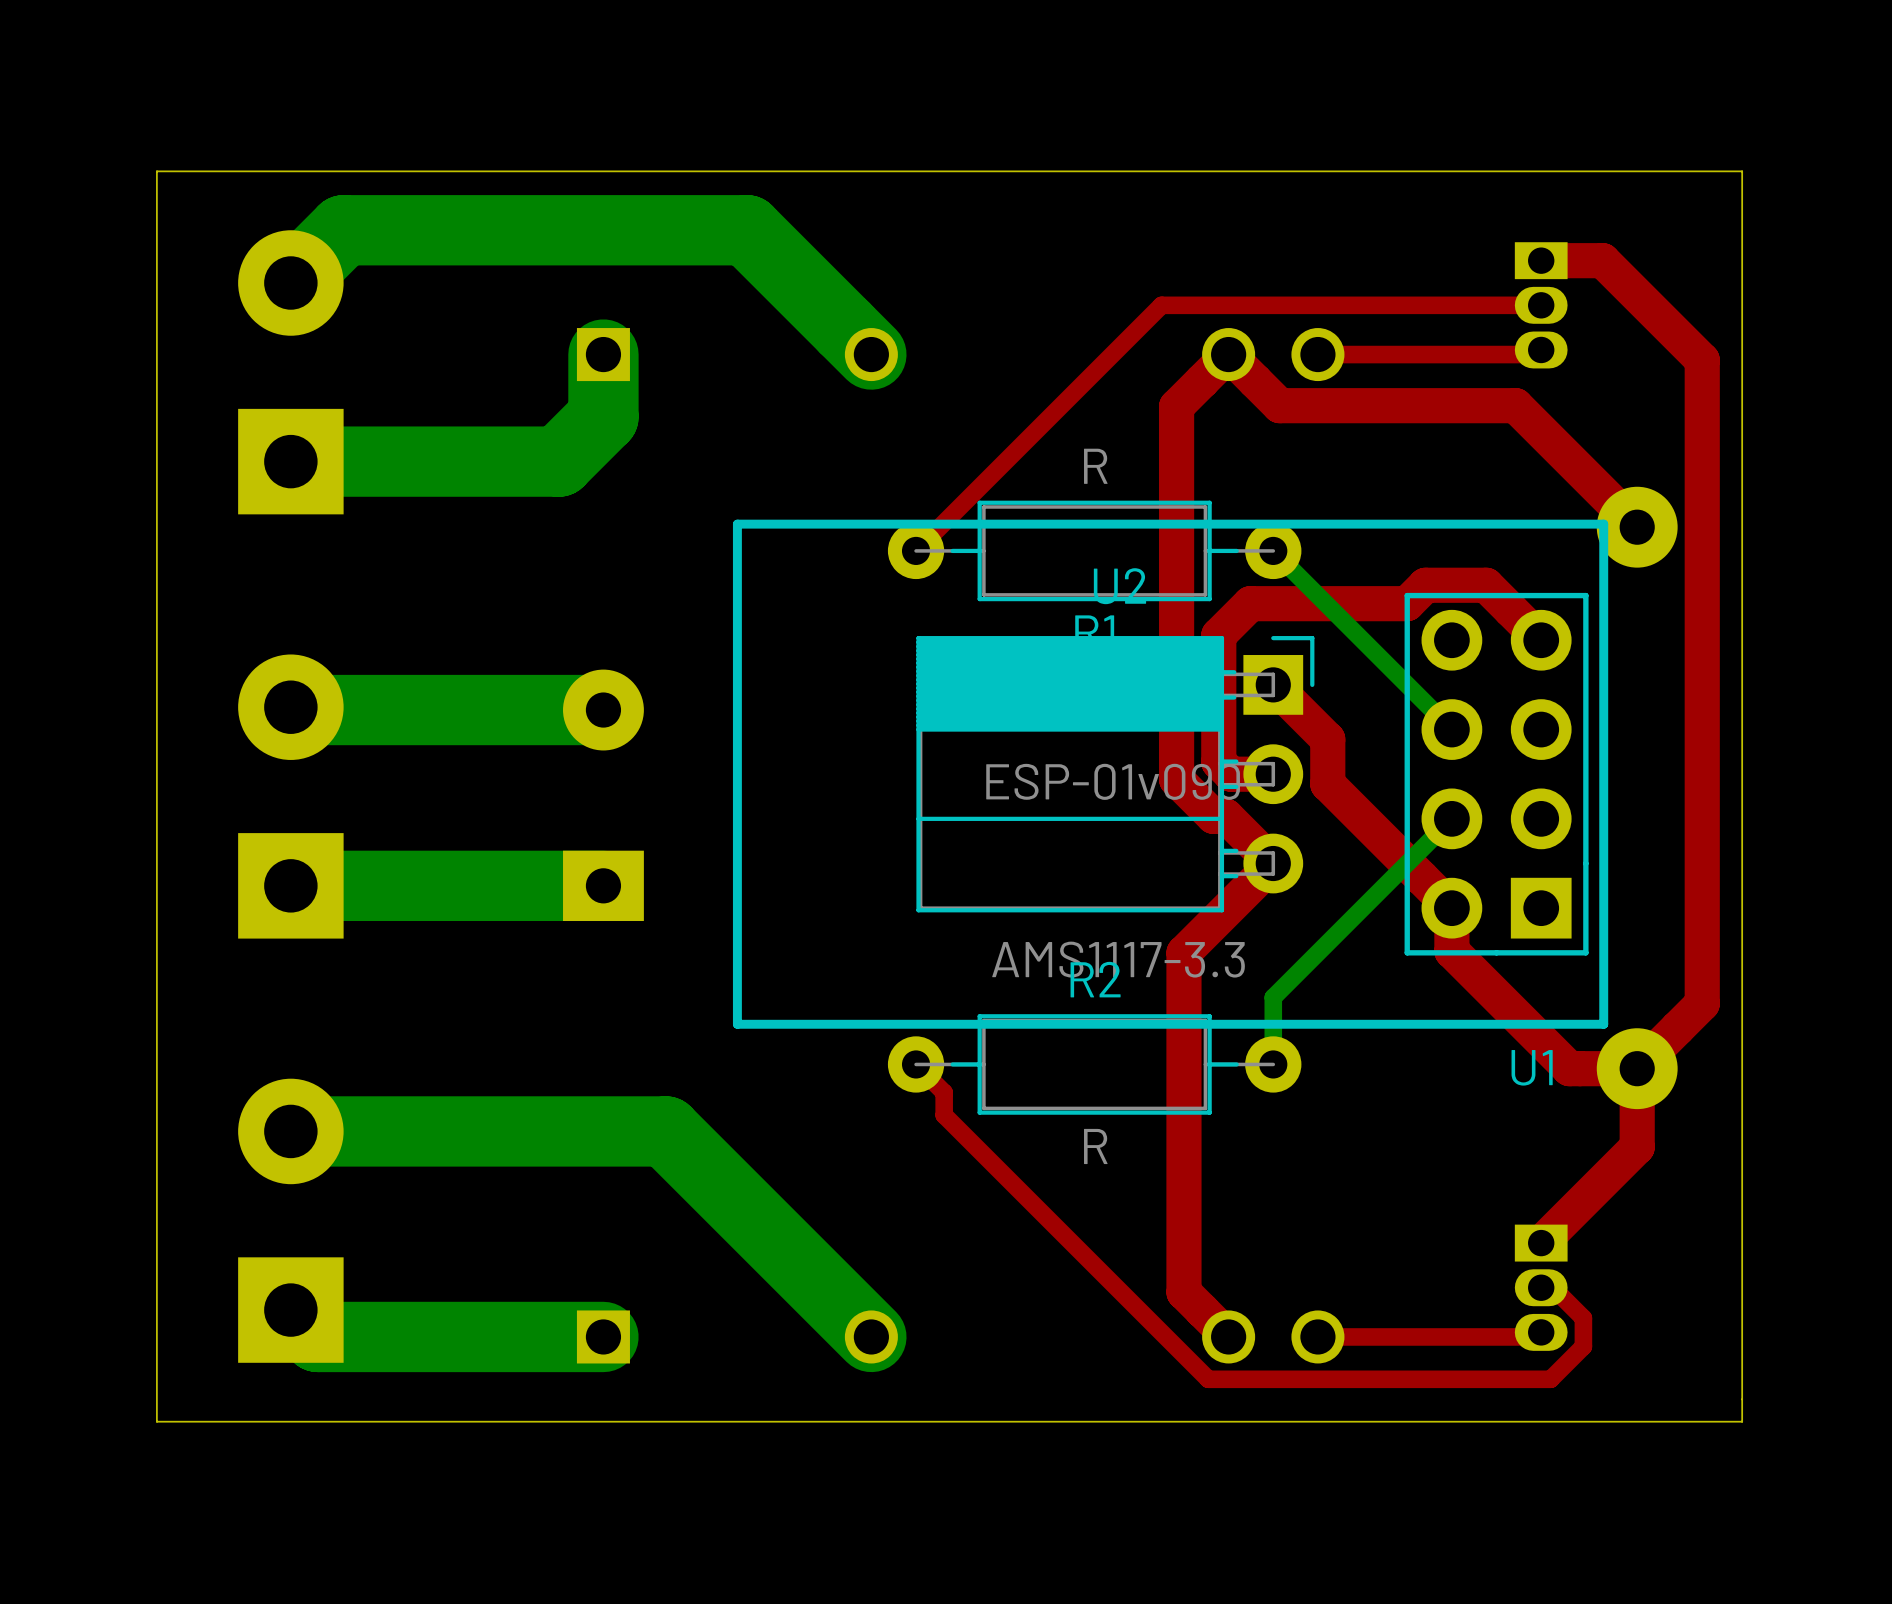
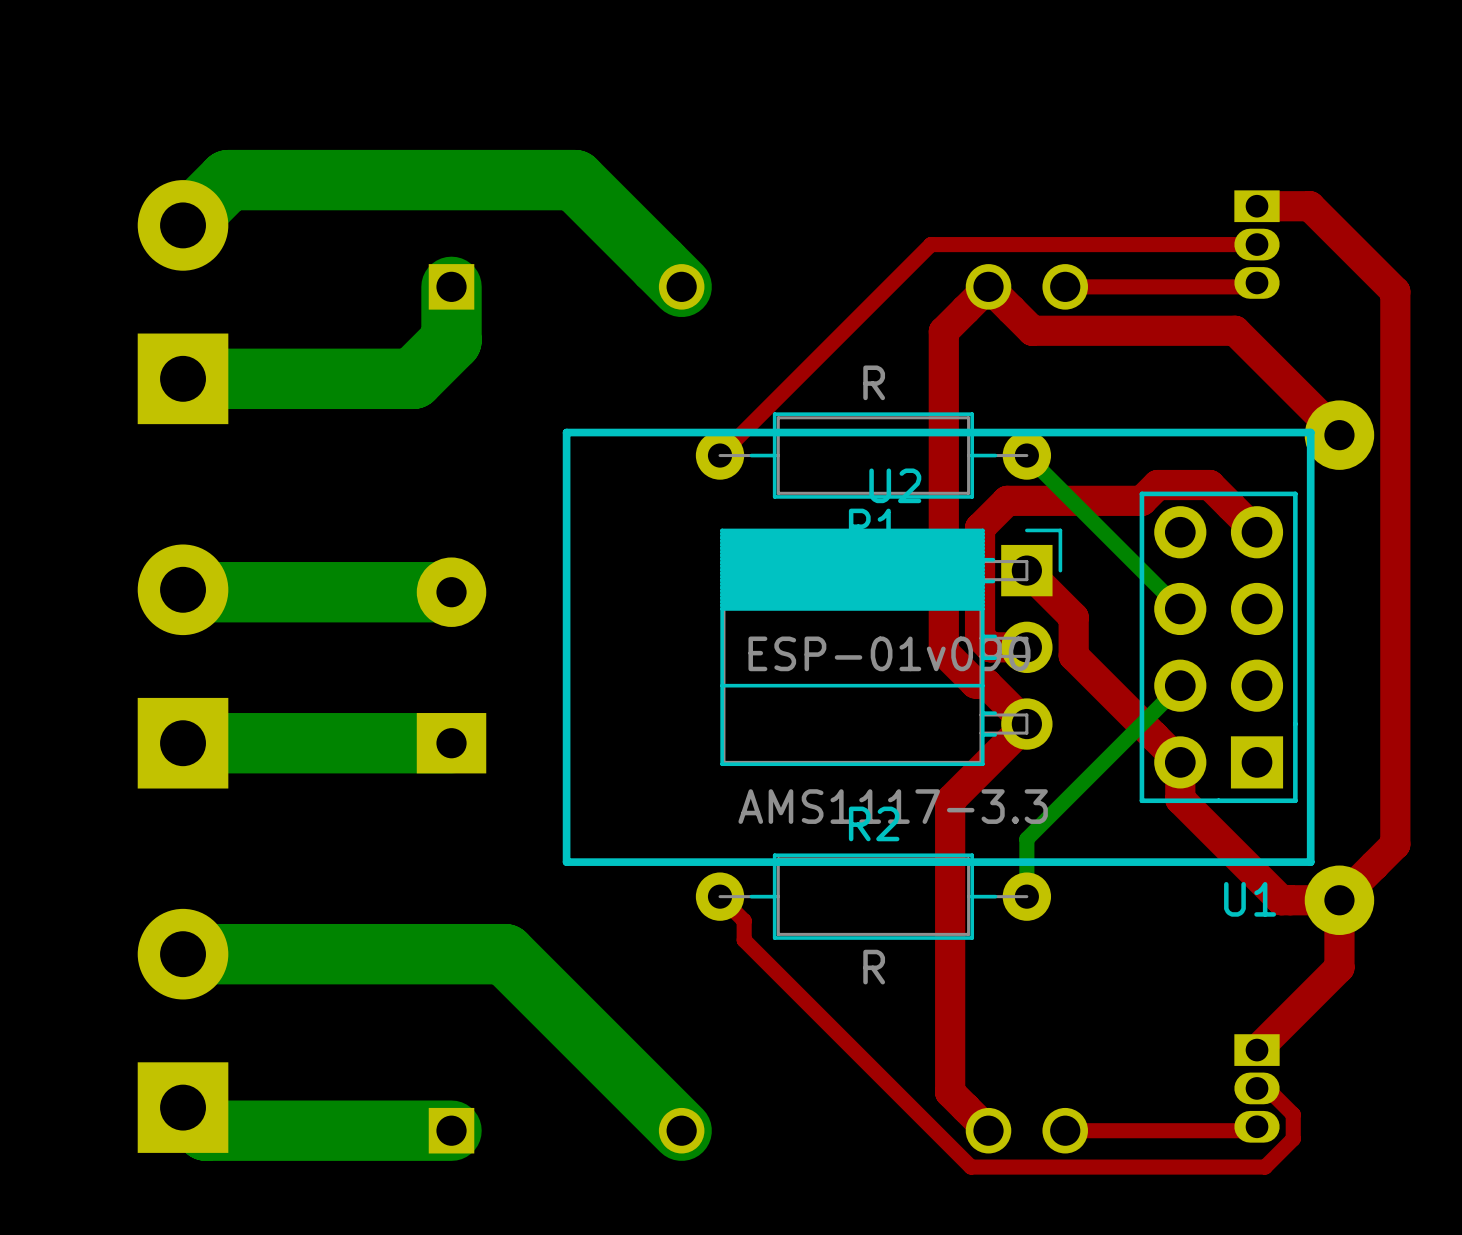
board edge: (1742, 171) (1742, 1421) (156, 1421) (156, 171) (1742, 171) -> none

